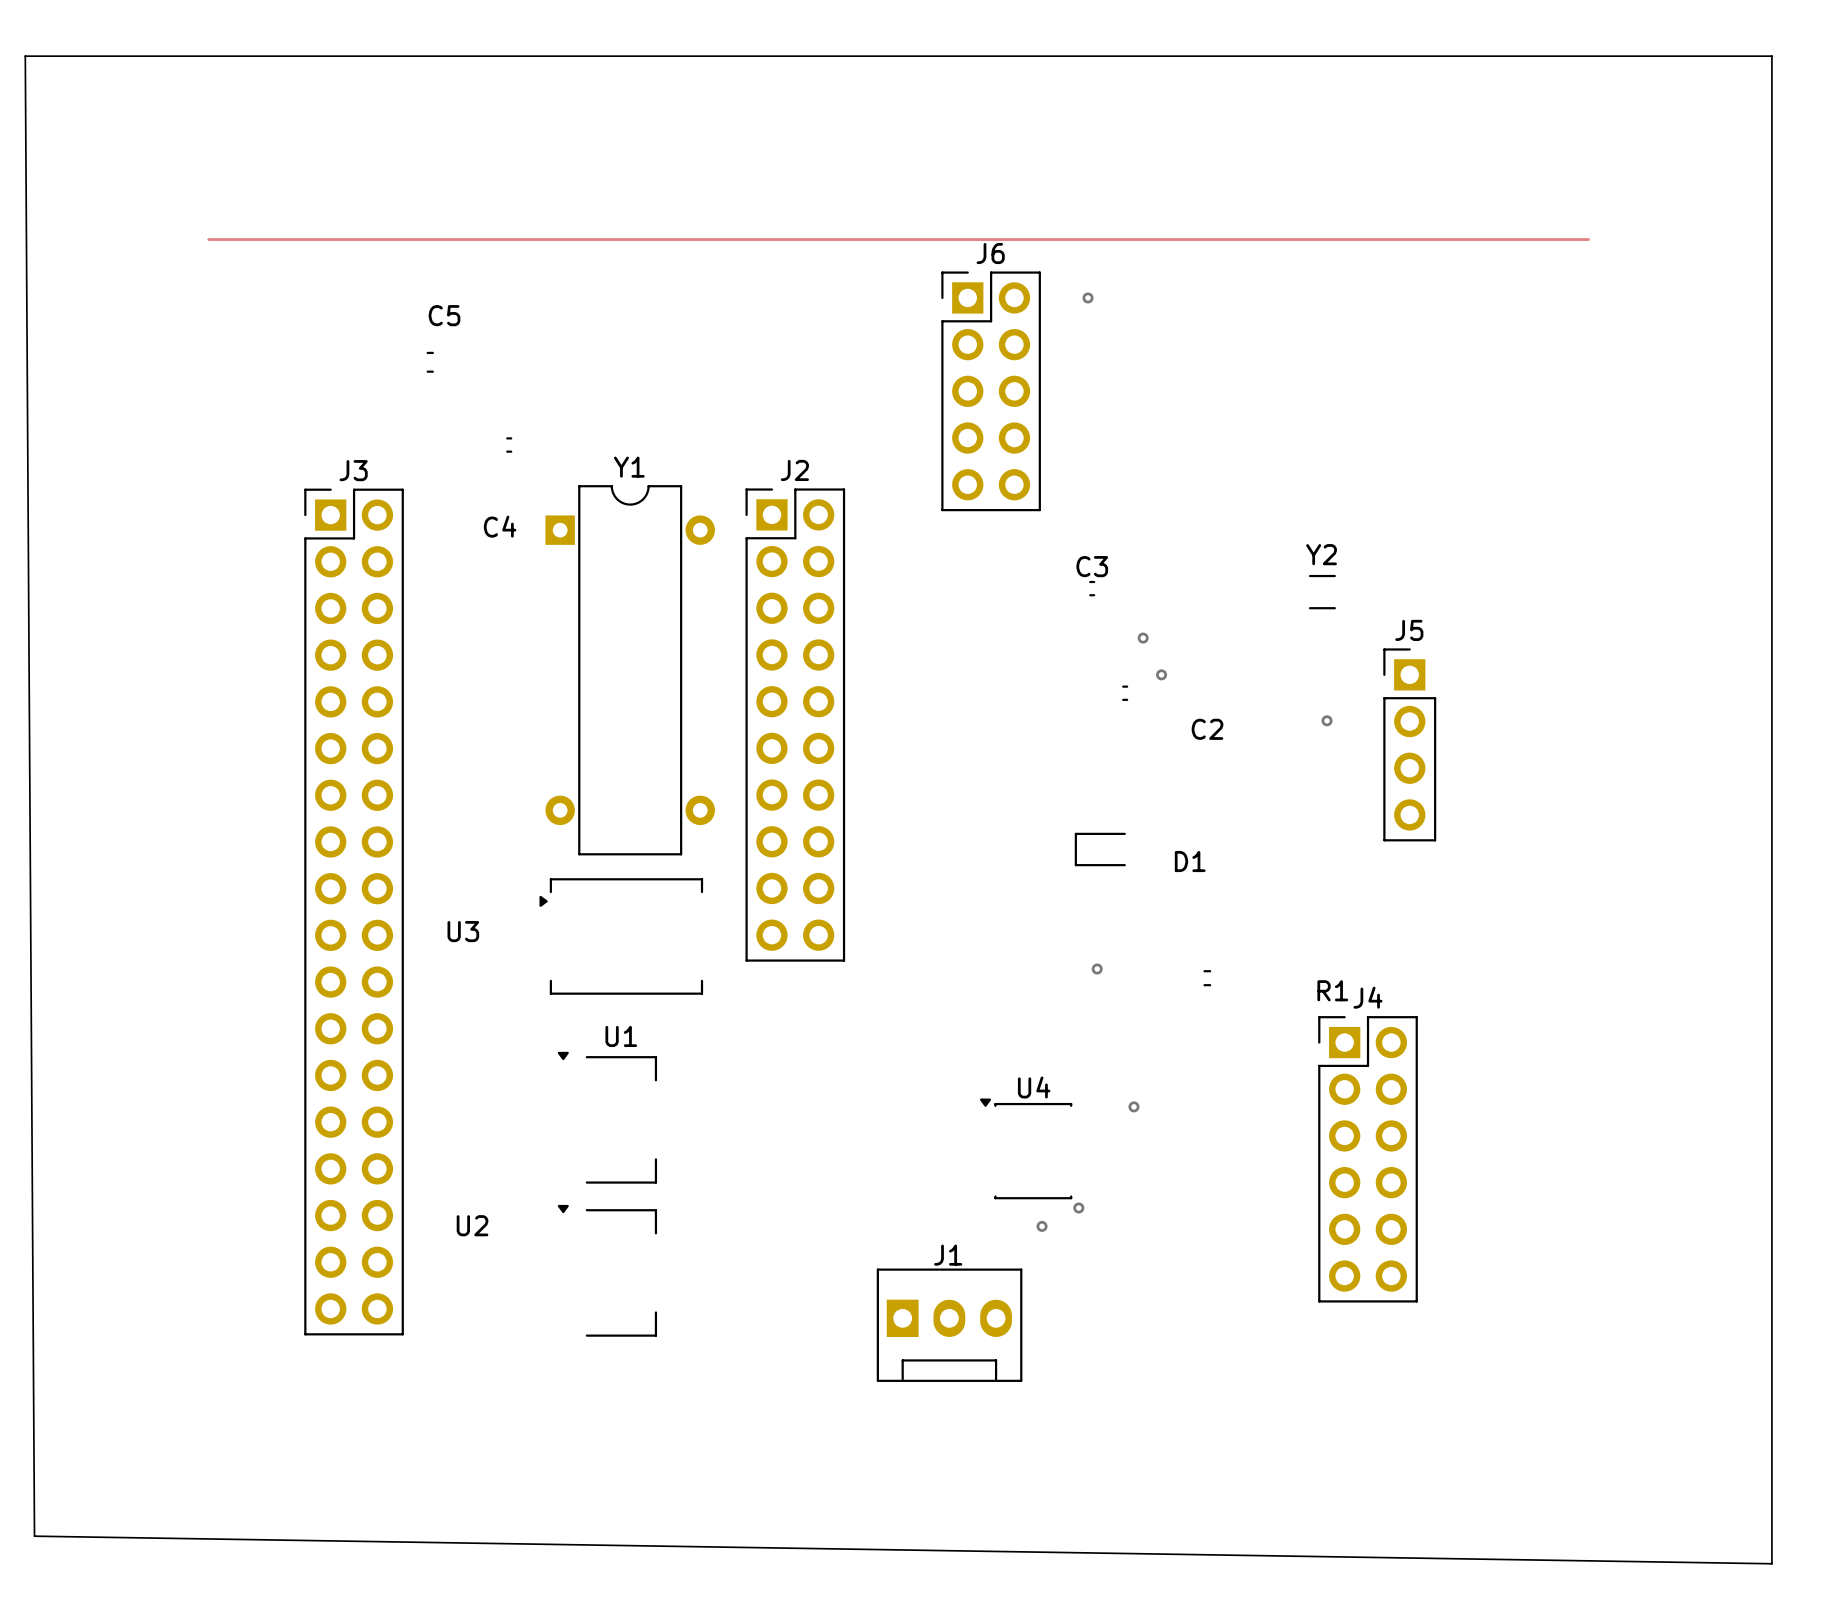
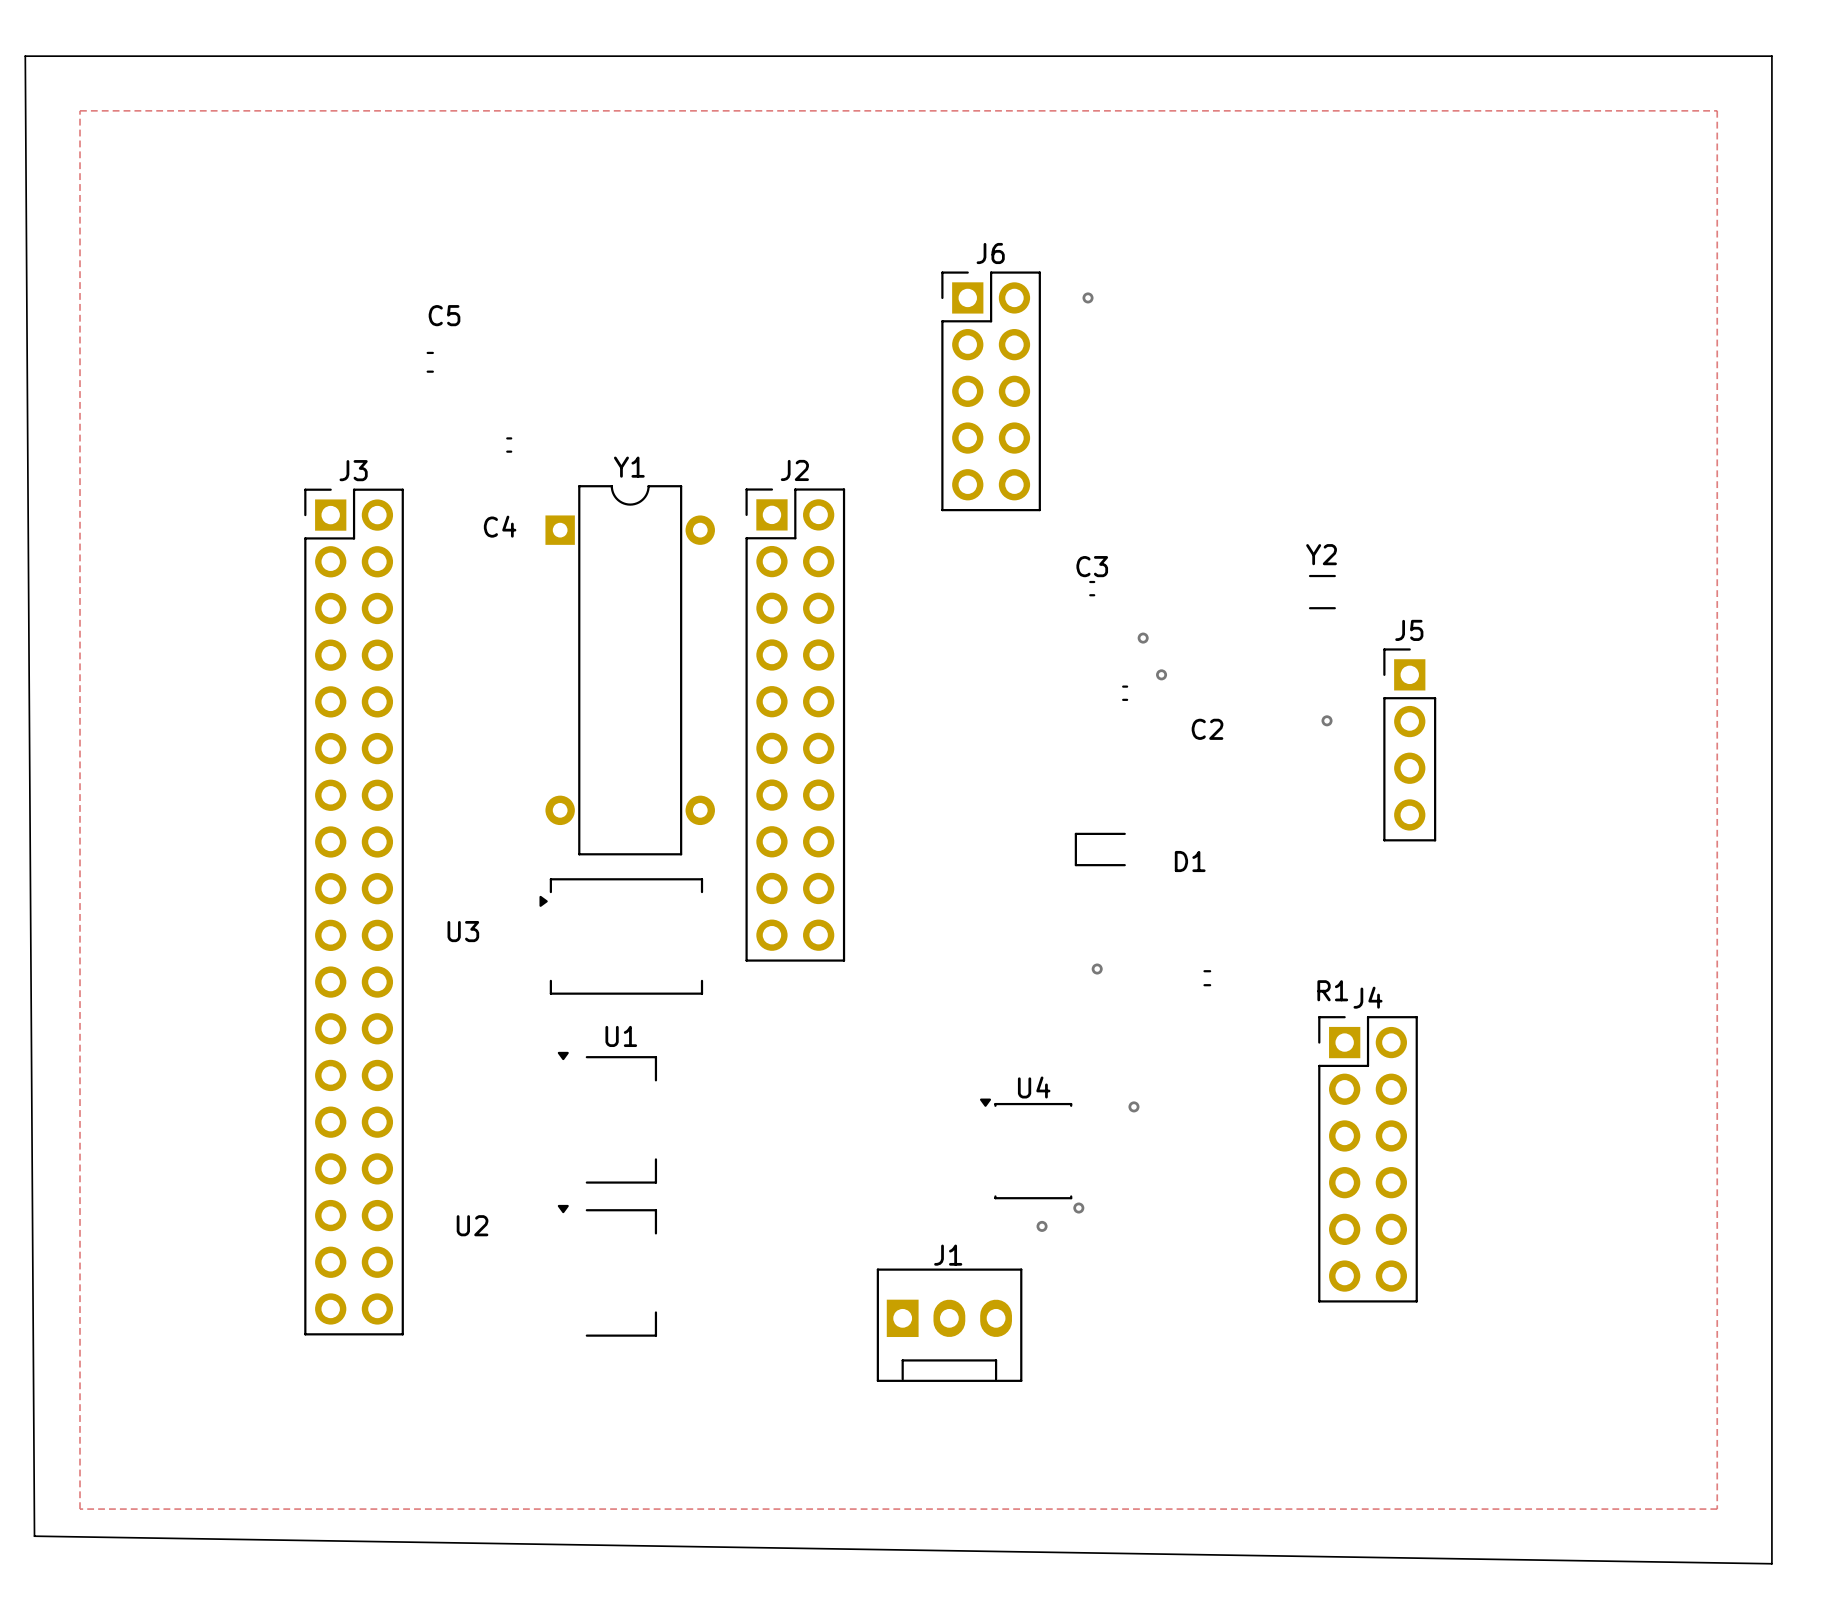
zone outline: none -> (80, 110) (1717, 110) (1717, 1509) (80, 1509) (80, 110)
track: (208, 239) (1588, 239) -> none

